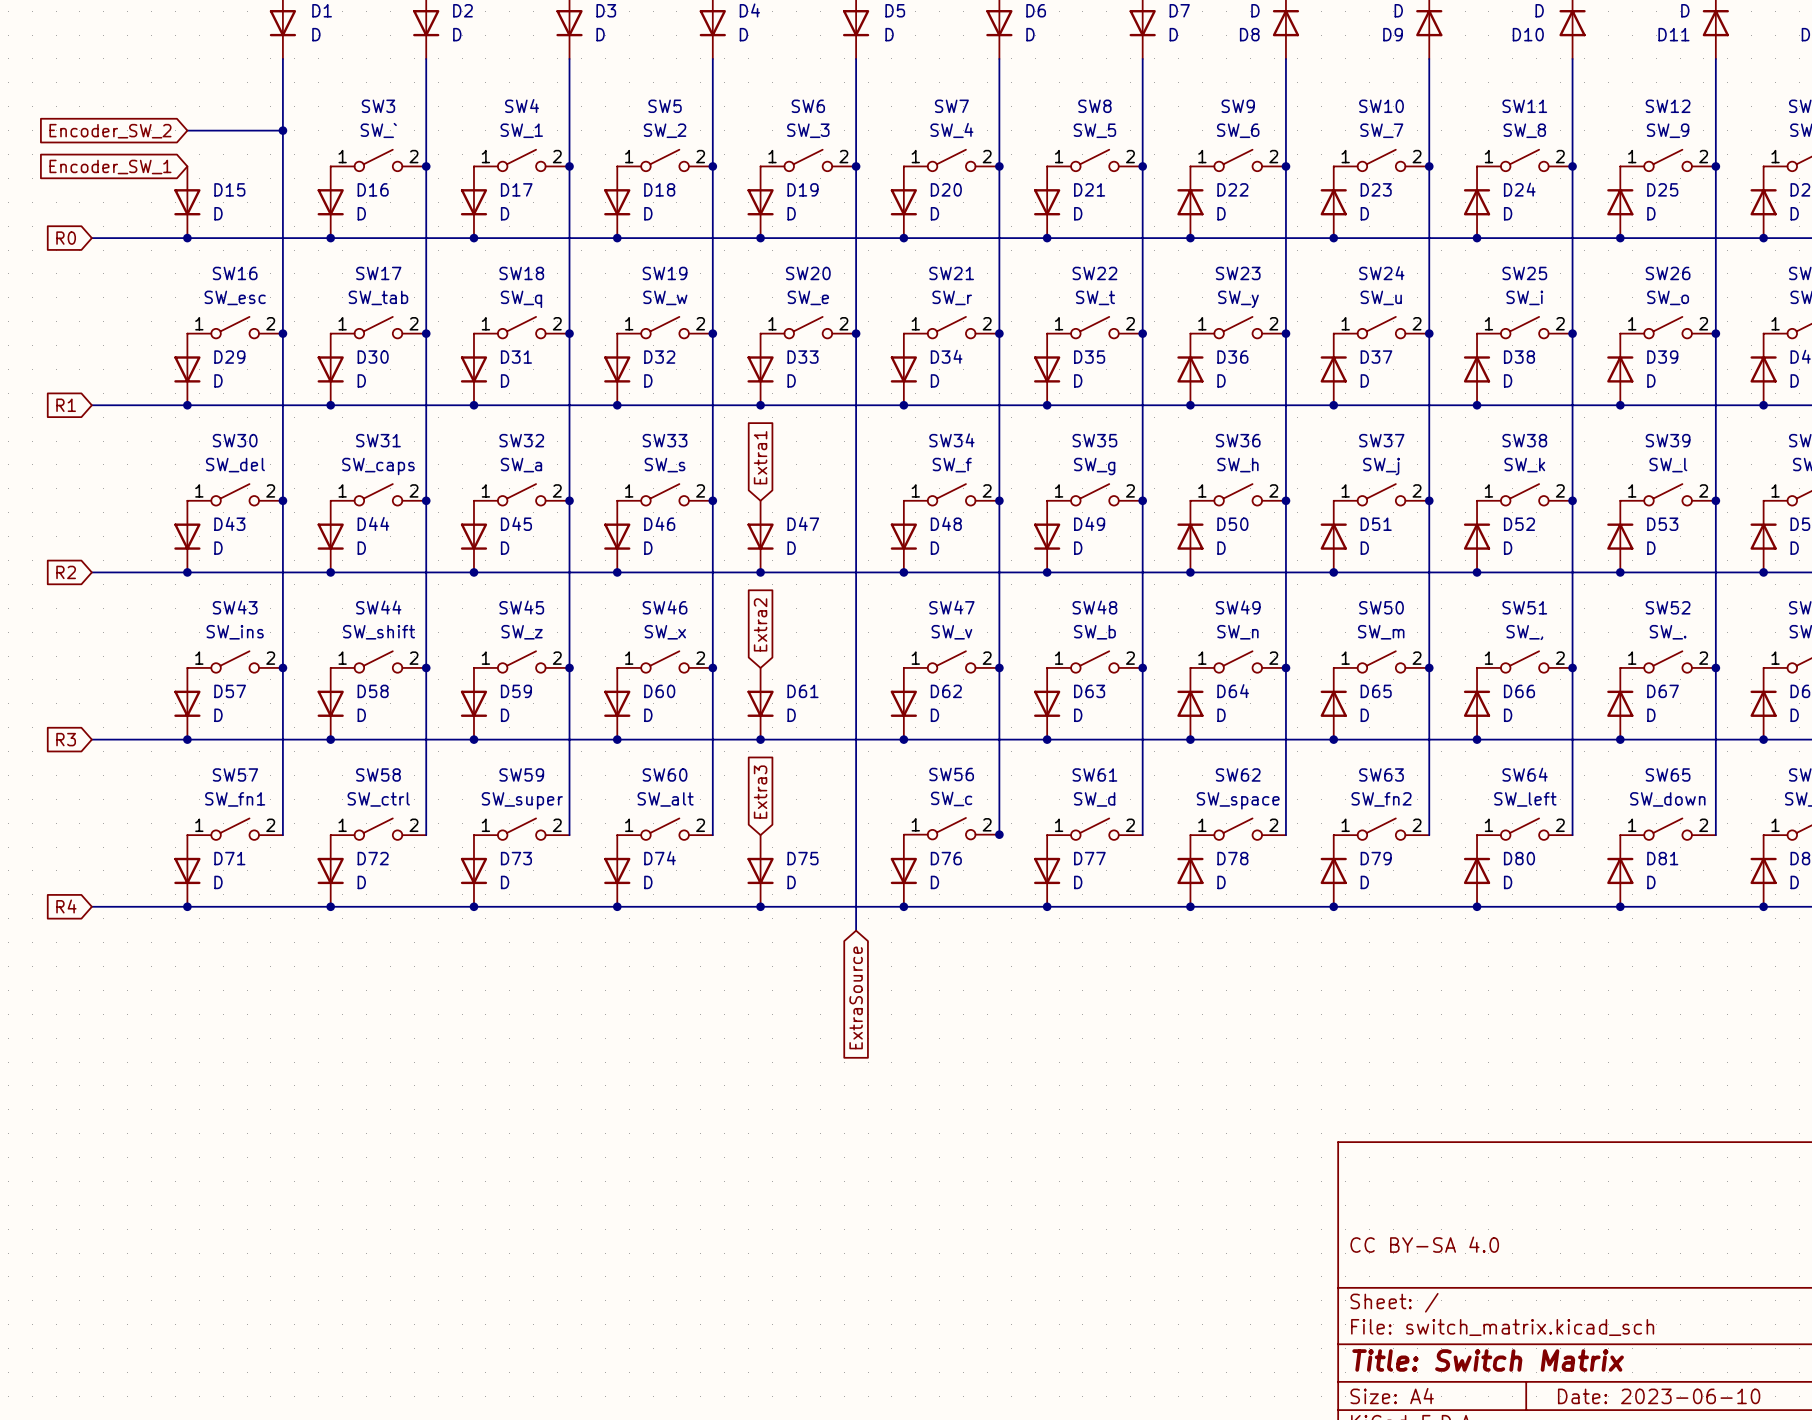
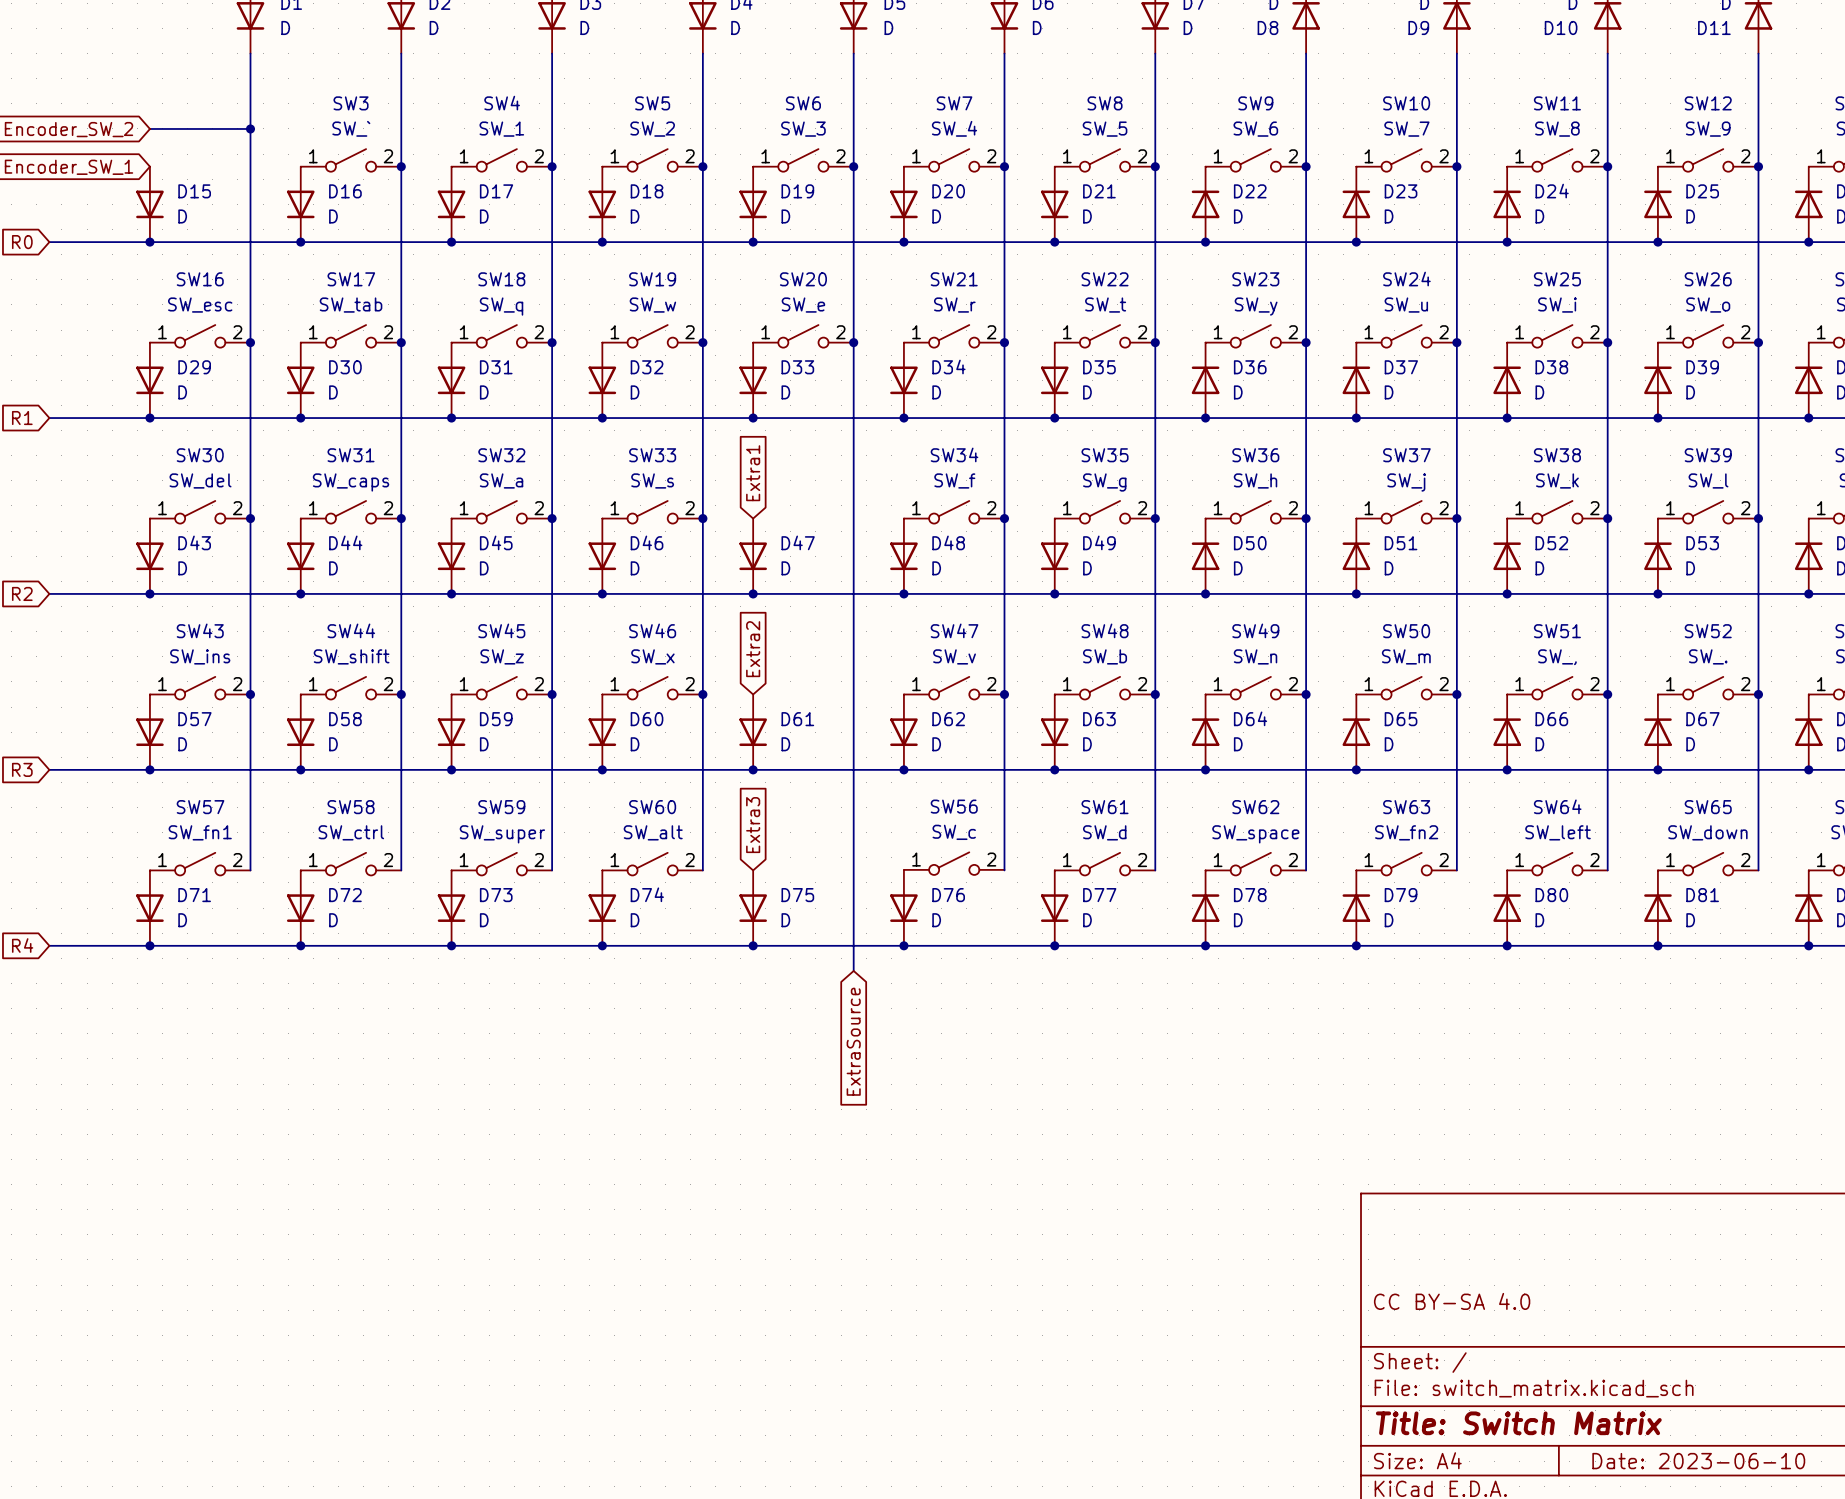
junction: (999, 834) -> none

